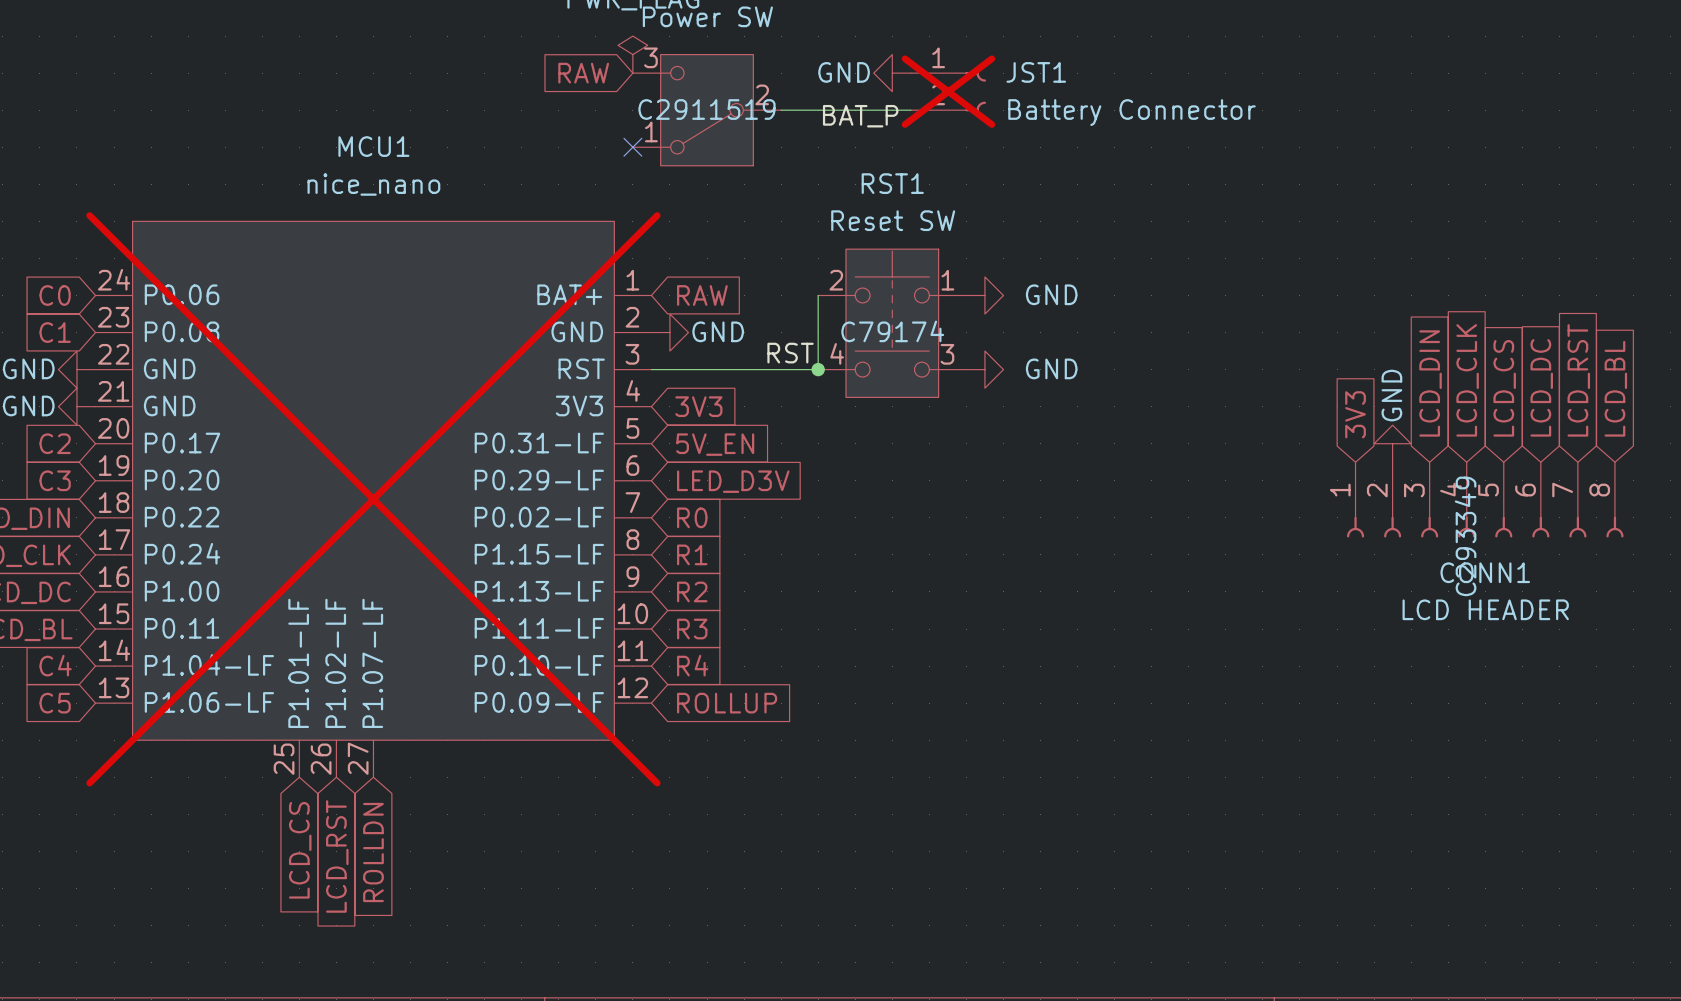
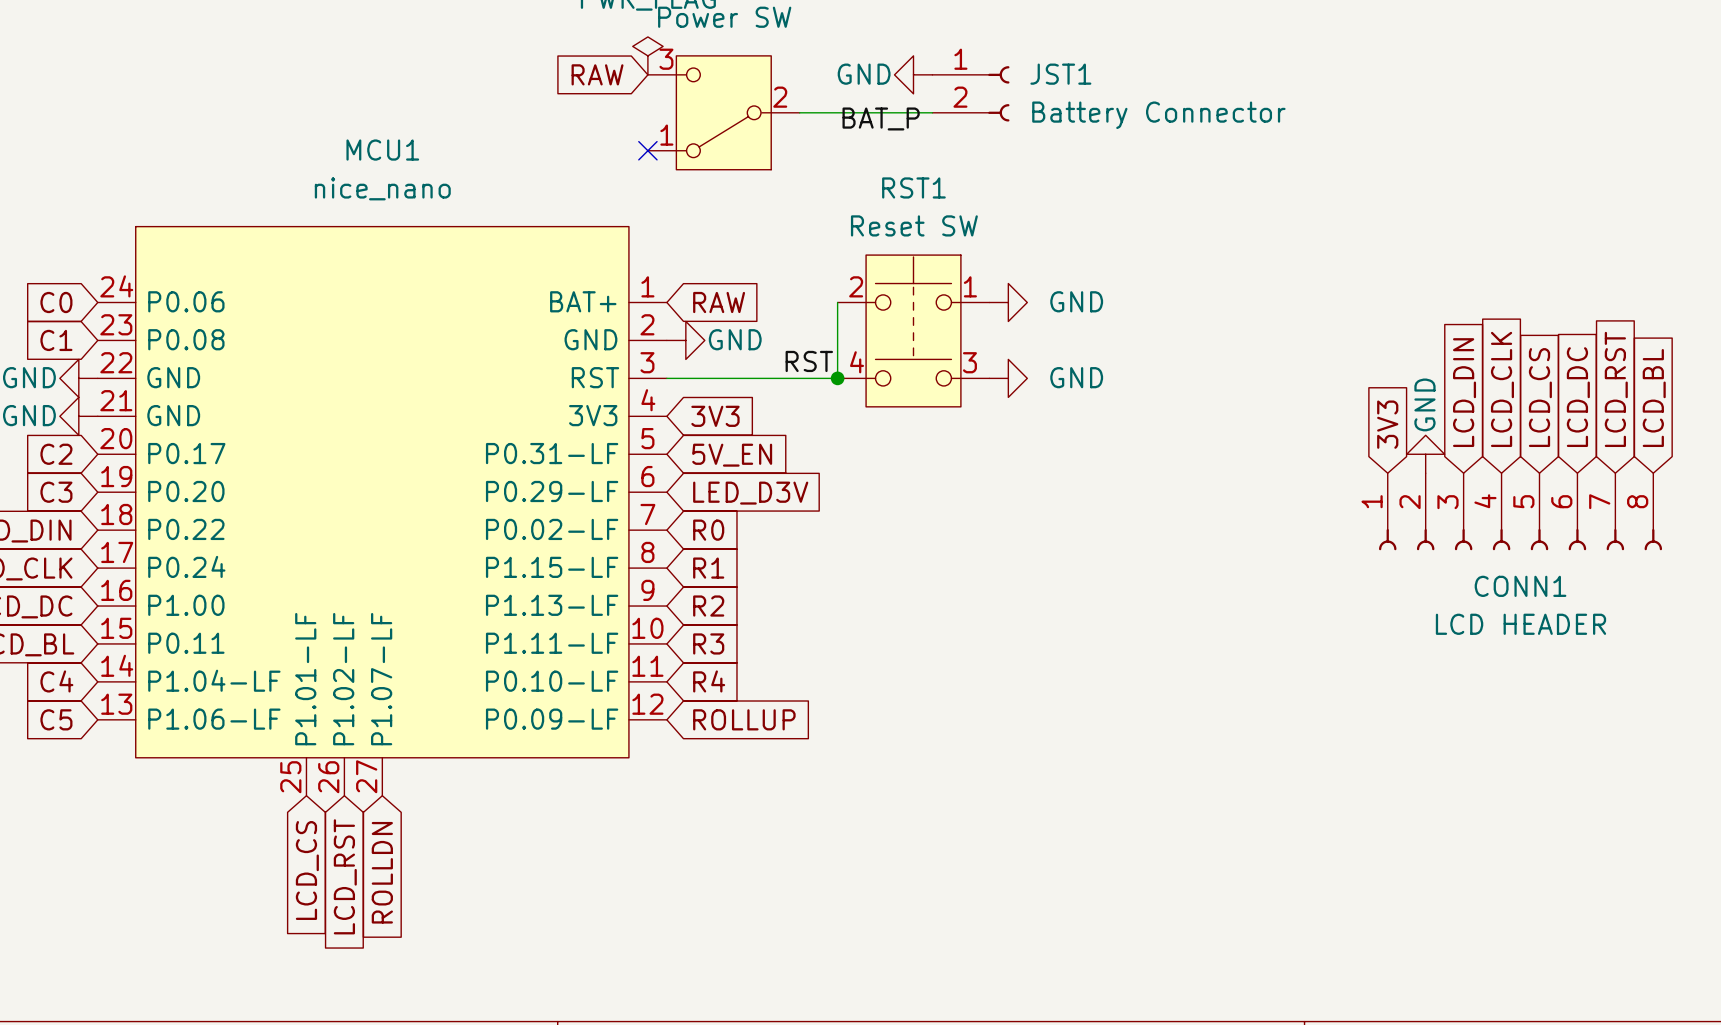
JST1 do-not-place cross: (948, 91) -> none
part text: C2911519 (707, 109) -> none
RST1 text: C79174 (892, 331) -> none
MCU1 do-not-place cross: (373, 499) -> none
CONN1 text: C293349 (1465, 536) -> none

